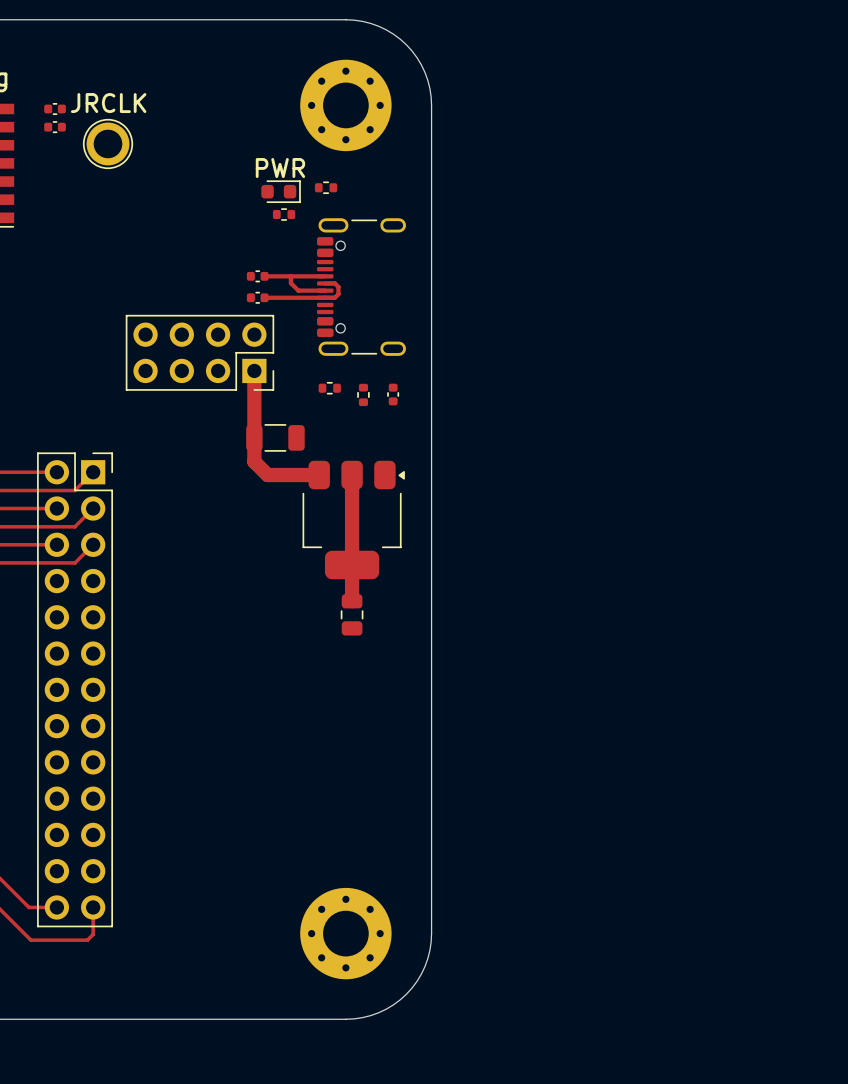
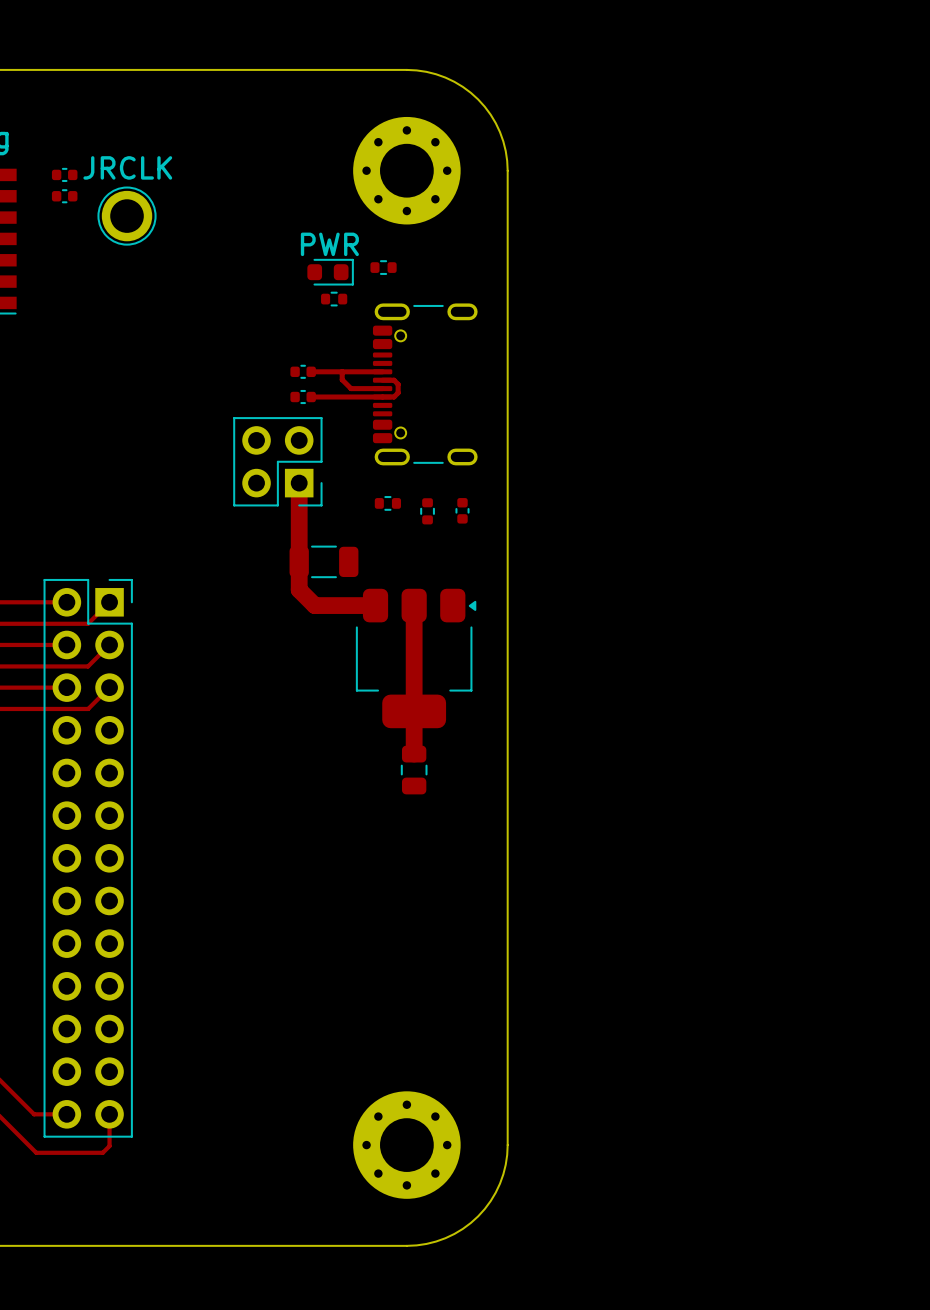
part: (199, 352) -> none
part: none -> (277, 461)

